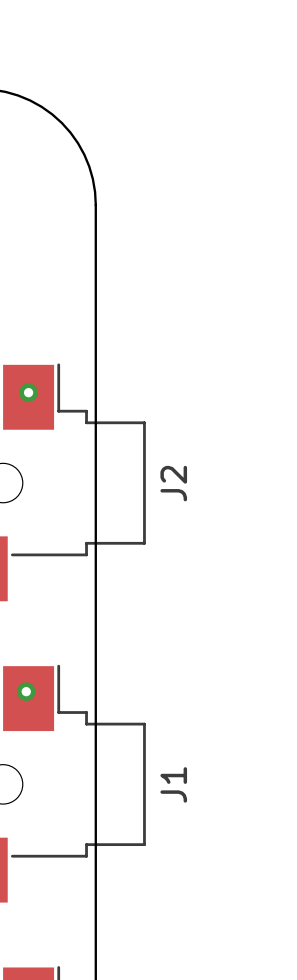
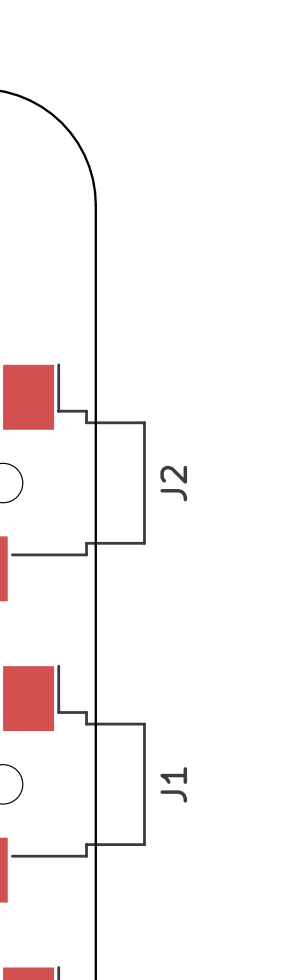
via: (28, 392) -> none
via: (26, 691) -> none

